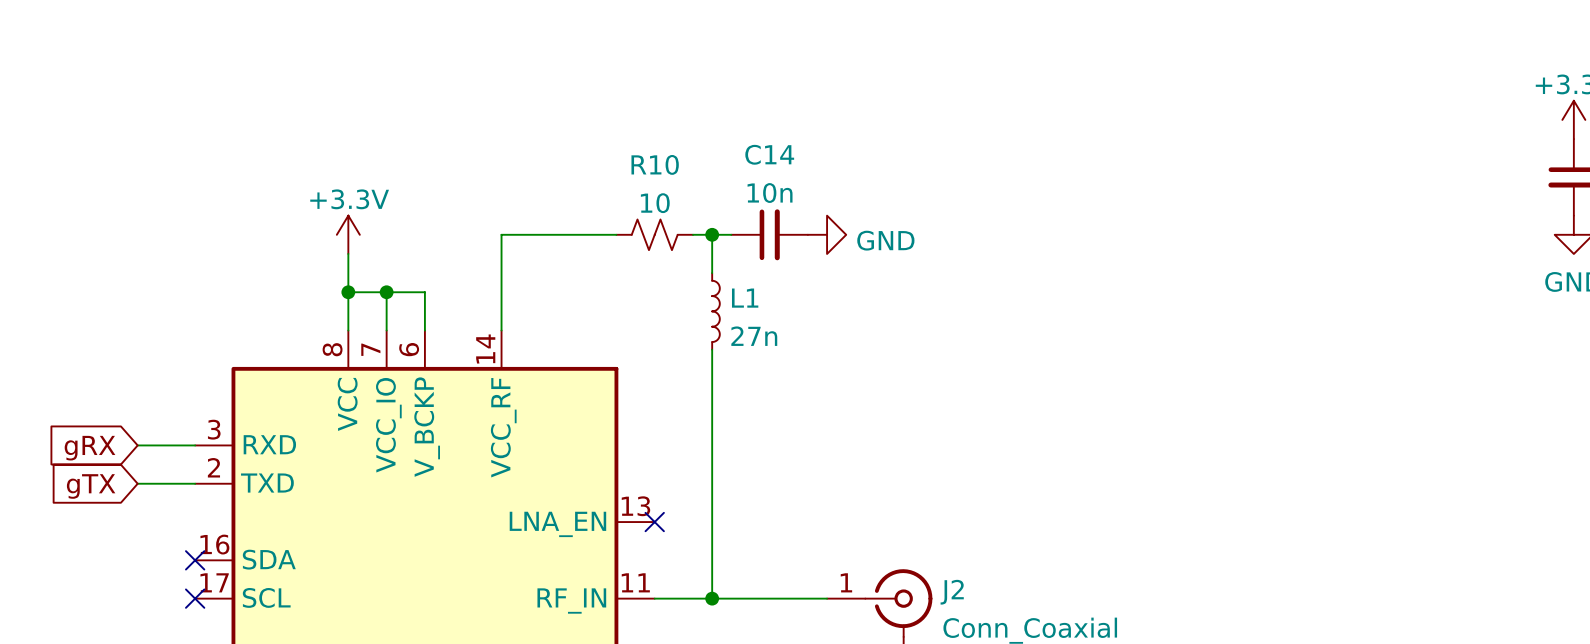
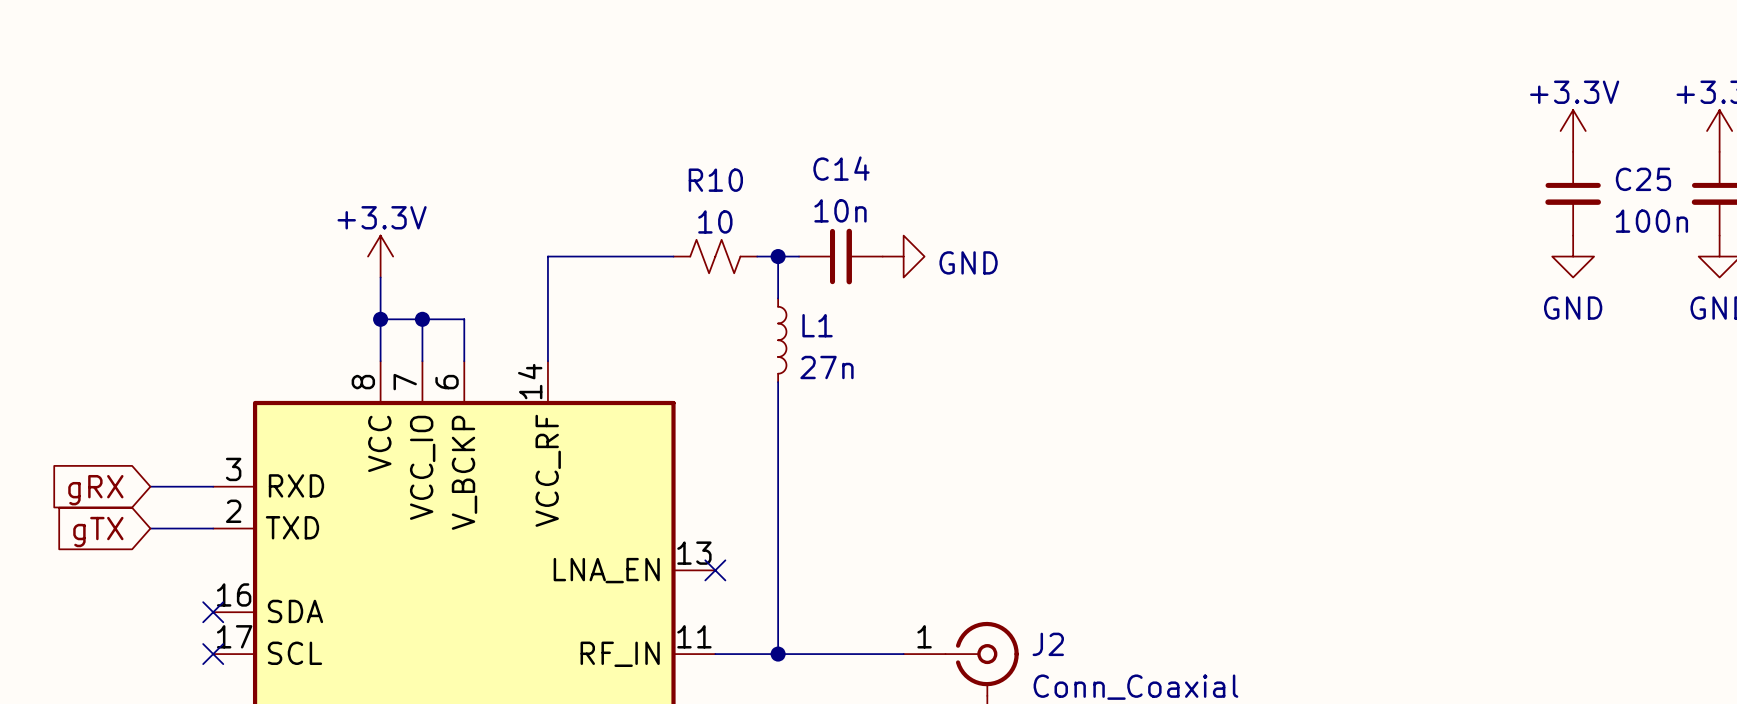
power symbol: none -> +3.3V (1573, 131)
C25: none -> 100n (1573, 193)
power symbol: none -> GND (1573, 256)

